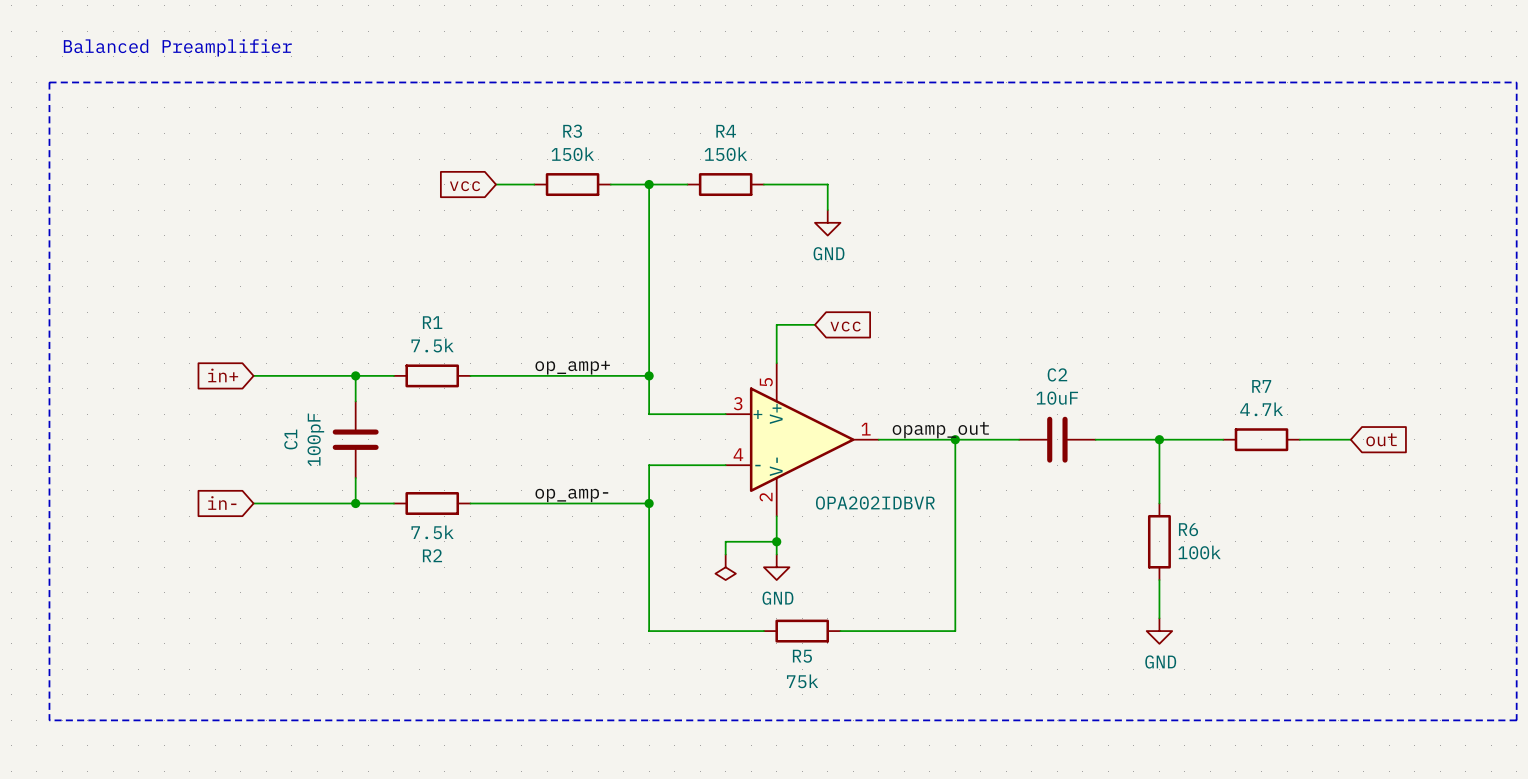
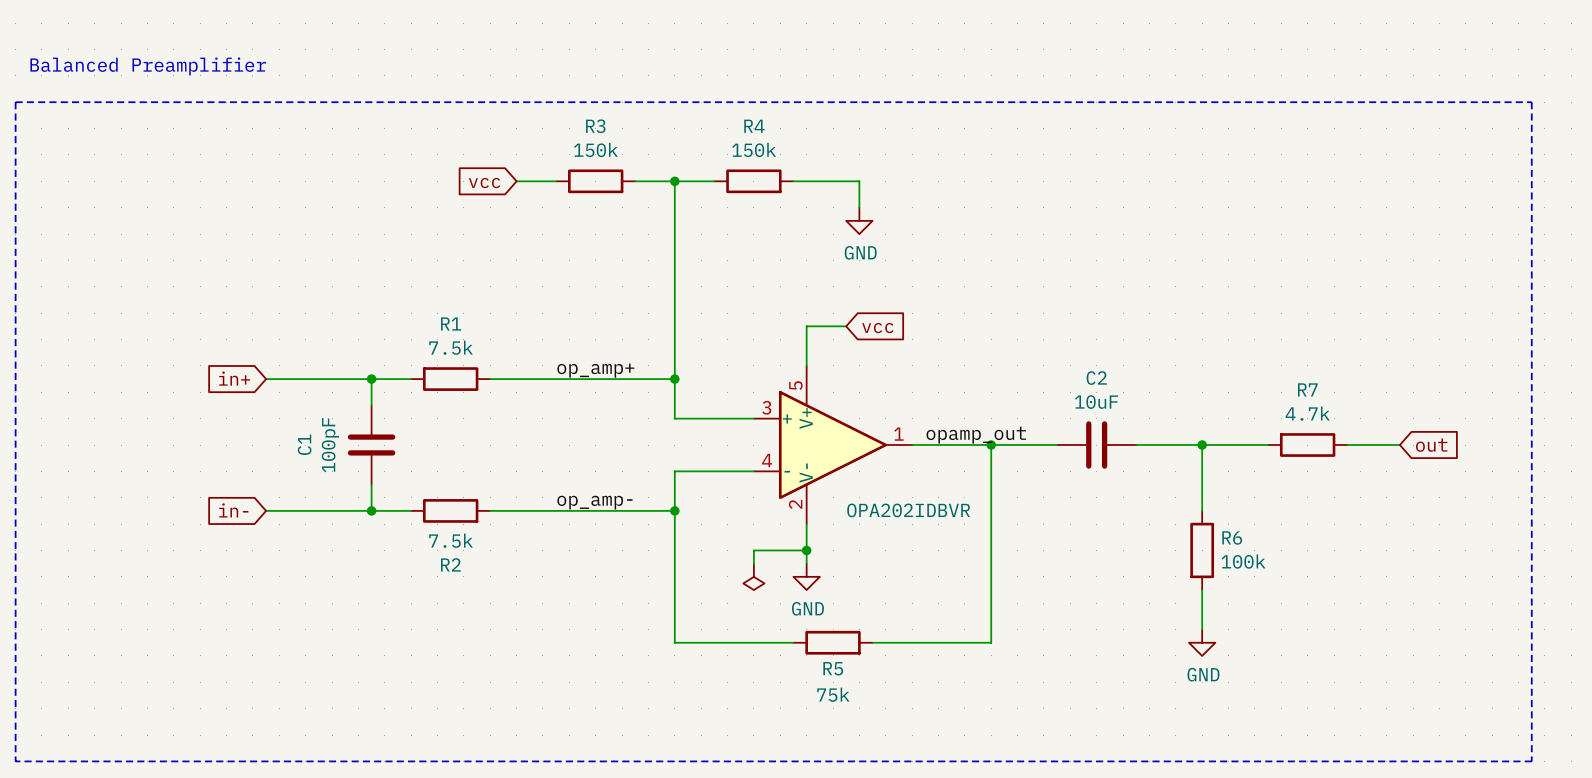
text position: Balanced Preamplifier (177, 47) -> Balanced Preamplifier (148, 66)
line: (49, 82) (1516, 82) (1516, 720) (49, 720) (49, 82) -> (15, 102) (1531, 102) (1531, 761) (15, 761) (15, 102)

